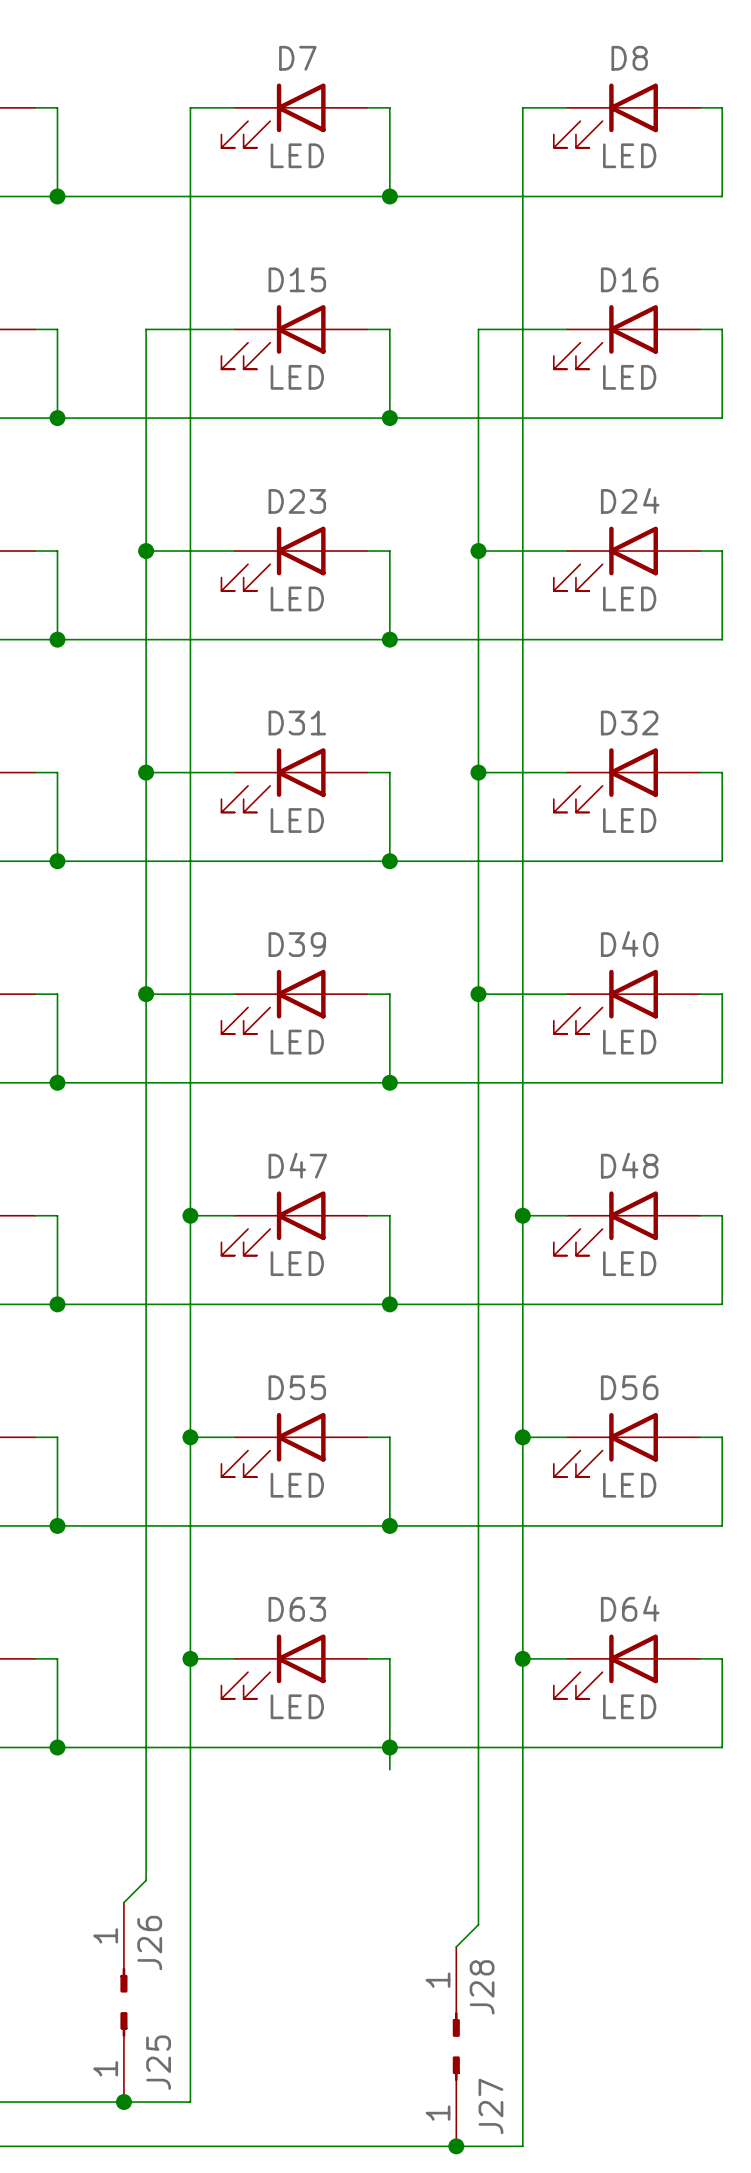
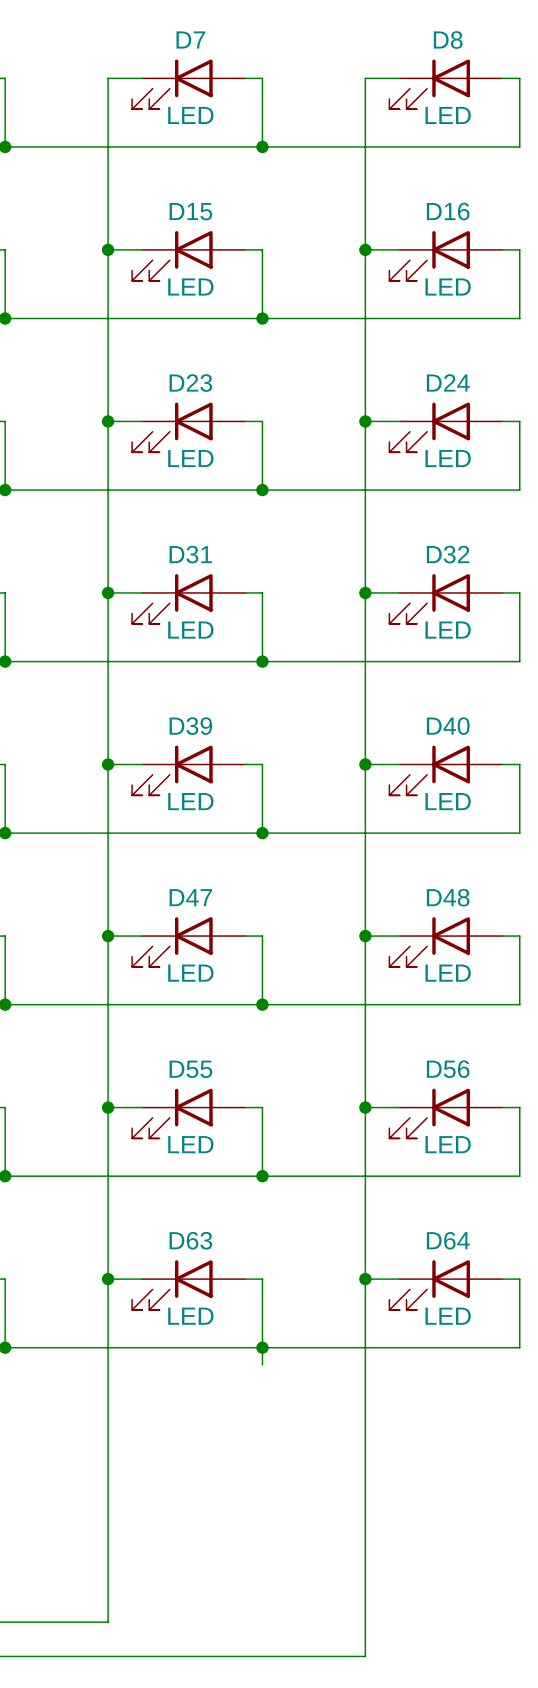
wire: (190, 329) (146, 329) (146, 1880) (123, 1902) -> none
junction: none -> (108, 249)
wire: (522, 329) (478, 329) (478, 1924) (456, 1946) -> none
junction: none -> (365, 249)
wire: (146, 551) (190, 551) -> none
junction position: (146, 551) -> (108, 421)
wire: (478, 551) (522, 551) -> none
junction position: (478, 551) -> (365, 421)
wire: (146, 772) (190, 772) -> none
junction position: (146, 772) -> (108, 592)
wire: (478, 772) (522, 772) -> none
junction position: (478, 772) -> (365, 592)
wire: (146, 994) (190, 994) -> none
junction position: (146, 994) -> (108, 764)
wire: (478, 994) (522, 994) -> none
junction position: (478, 994) -> (365, 764)
J26: (123, 1947) -> none
J28: (456, 1991) -> none
J25: (123, 2057) -> none
J27: (456, 2101) -> none
junction: (123, 2102) -> none
junction: (456, 2146) -> none

